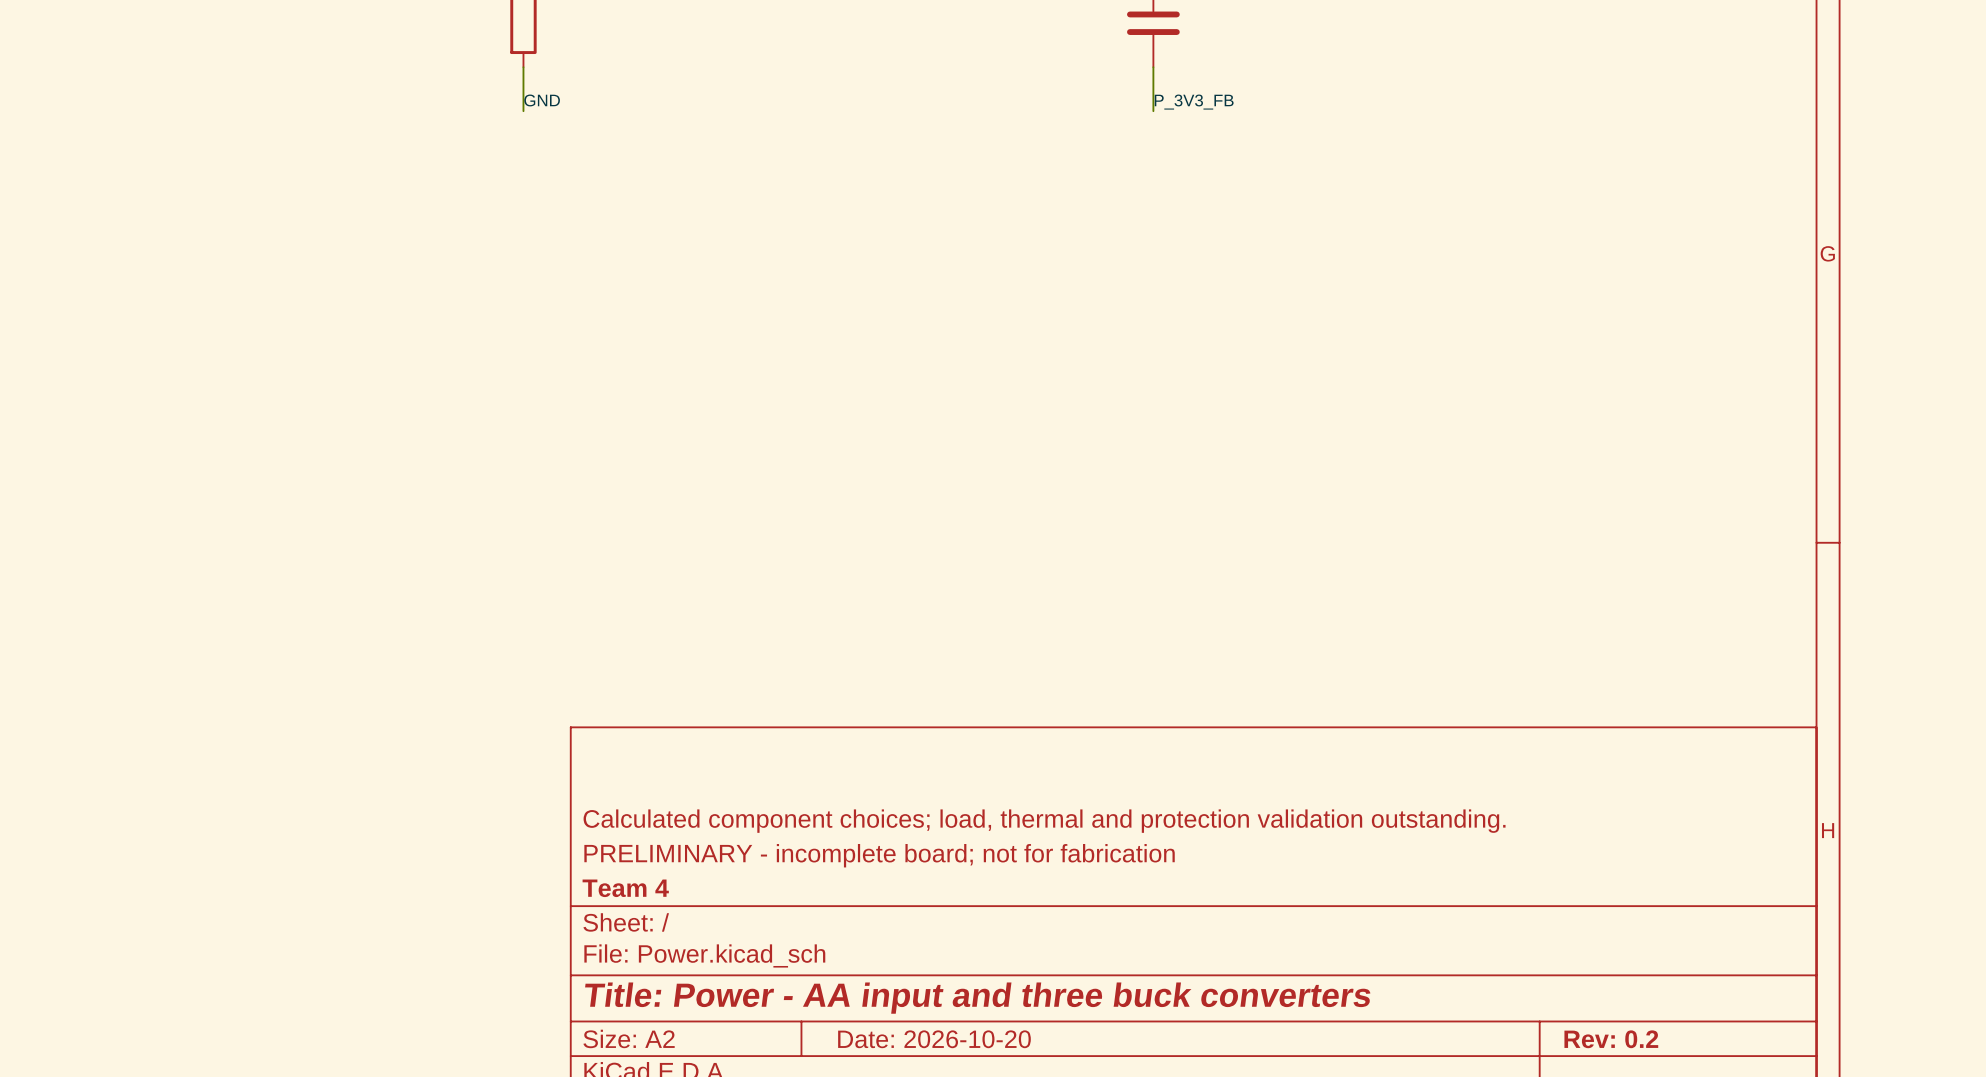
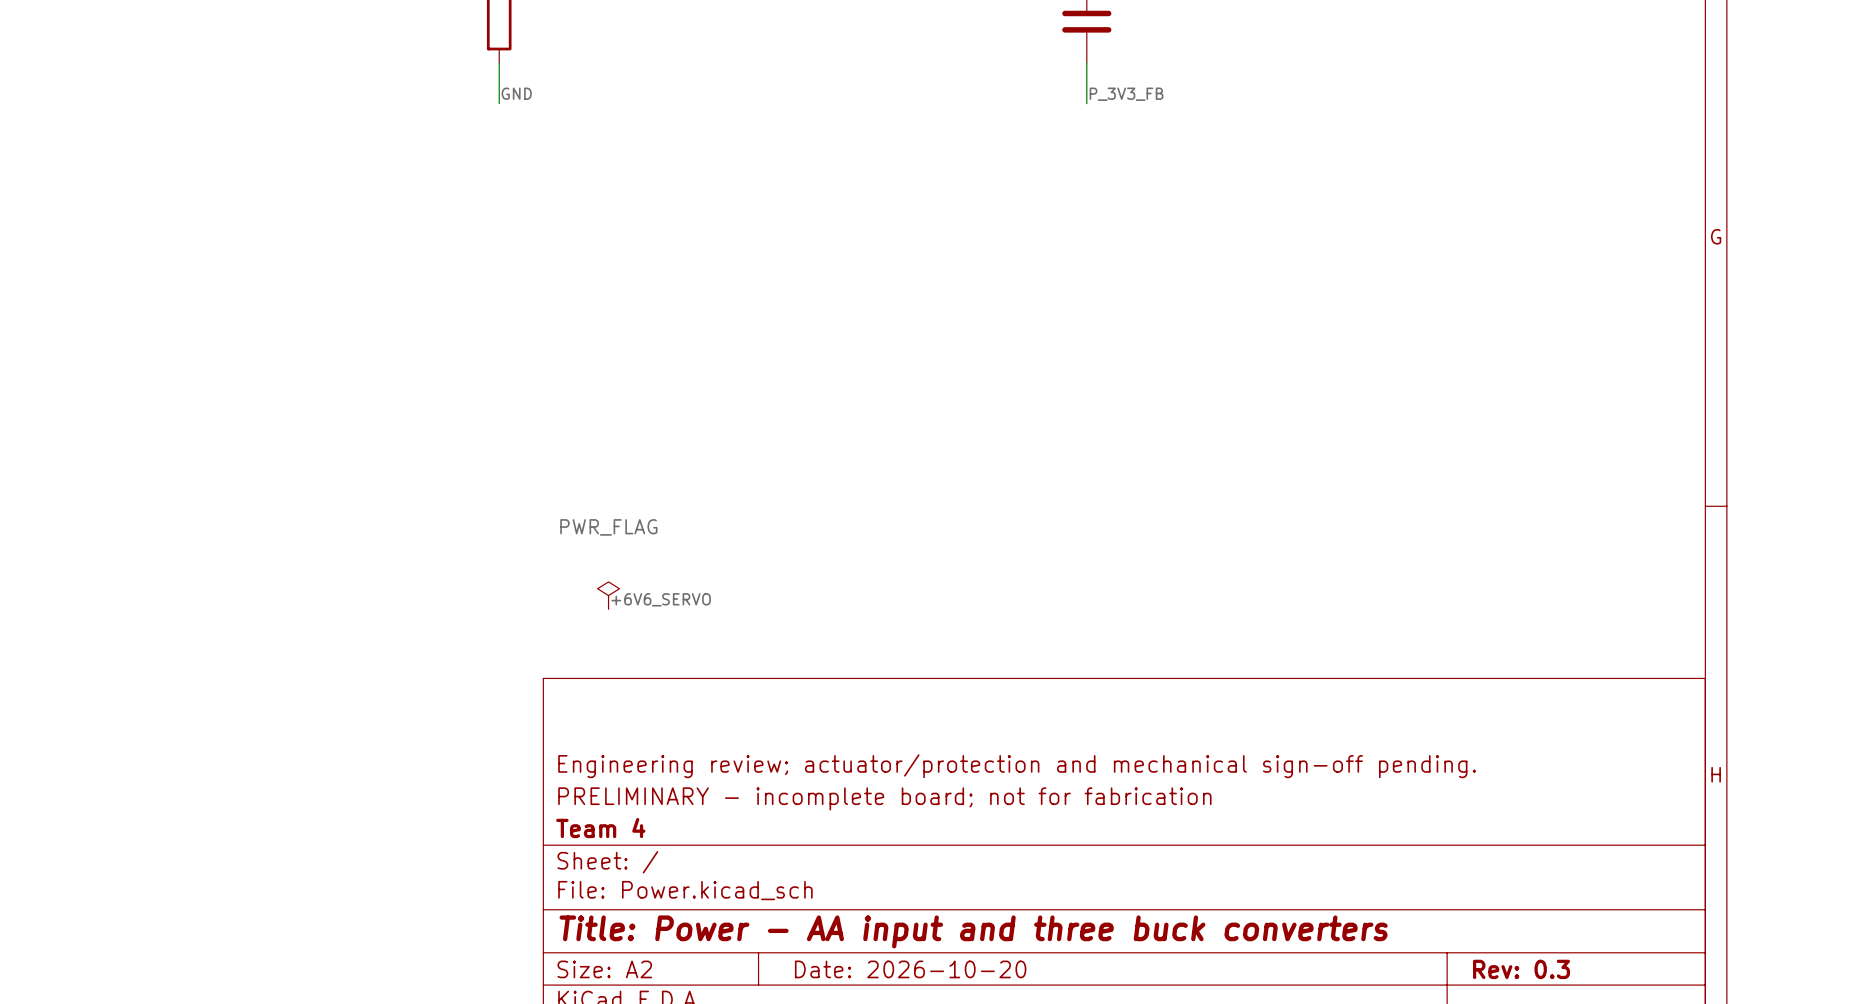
power symbol: none -> PWR_FLAG (608, 595)
label: none -> +6V6_SERVO (661, 599)
title block: Calculated component choices; load, thermal and protection validation outstanding. (1044, 821) -> Engineering review; actuator/protection and mechanical sign-off pending. (1017, 766)
title block: Rev: 0.2 (1611, 1039) -> Rev: 0.3 (1521, 969)

